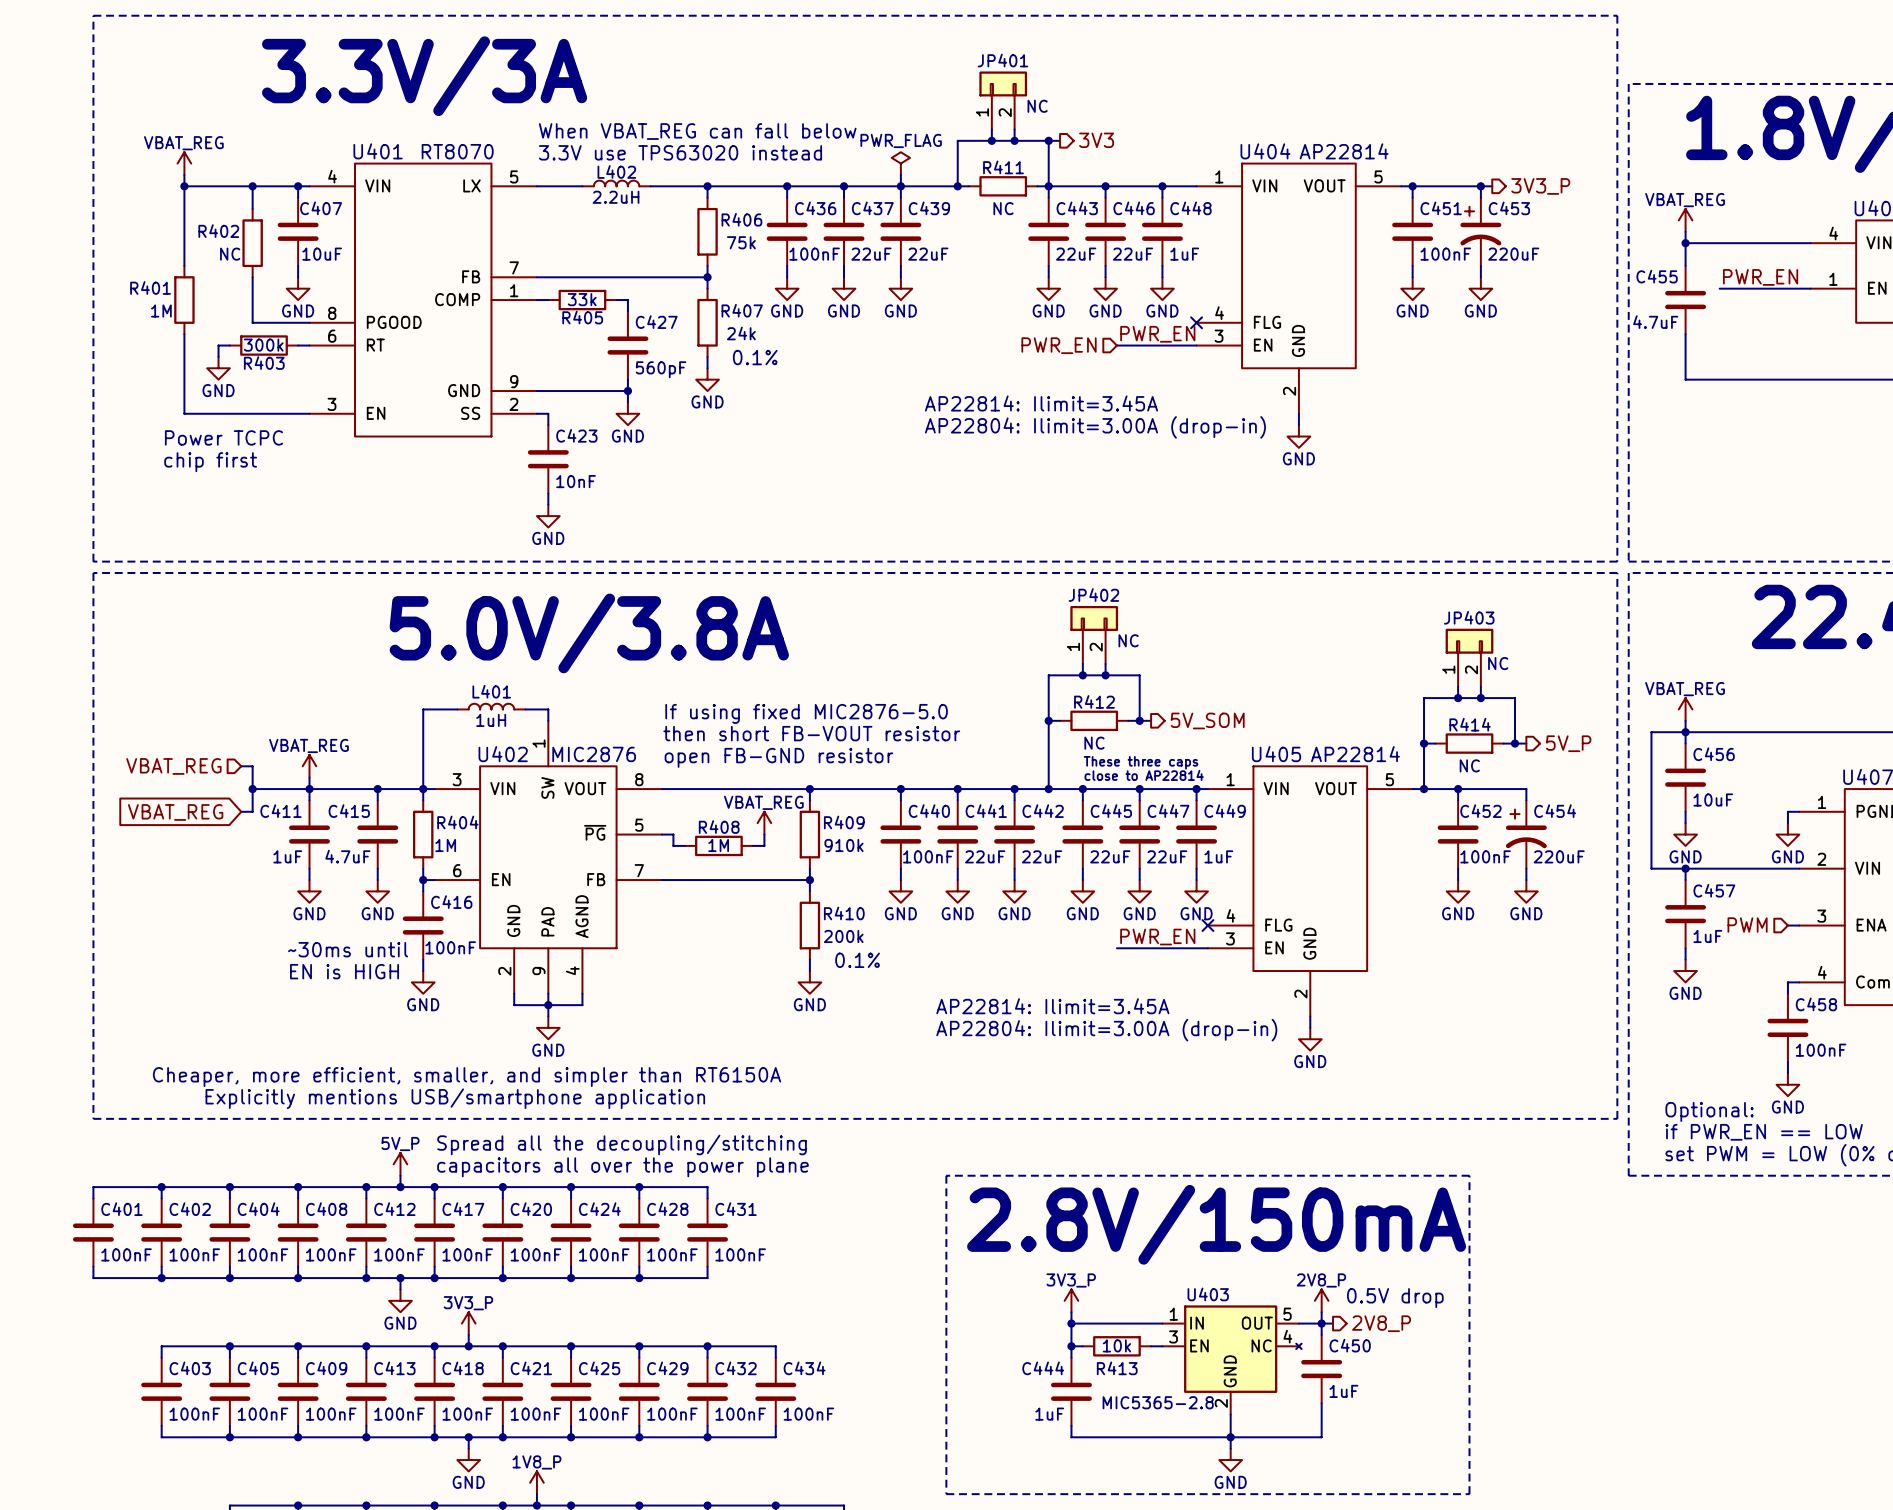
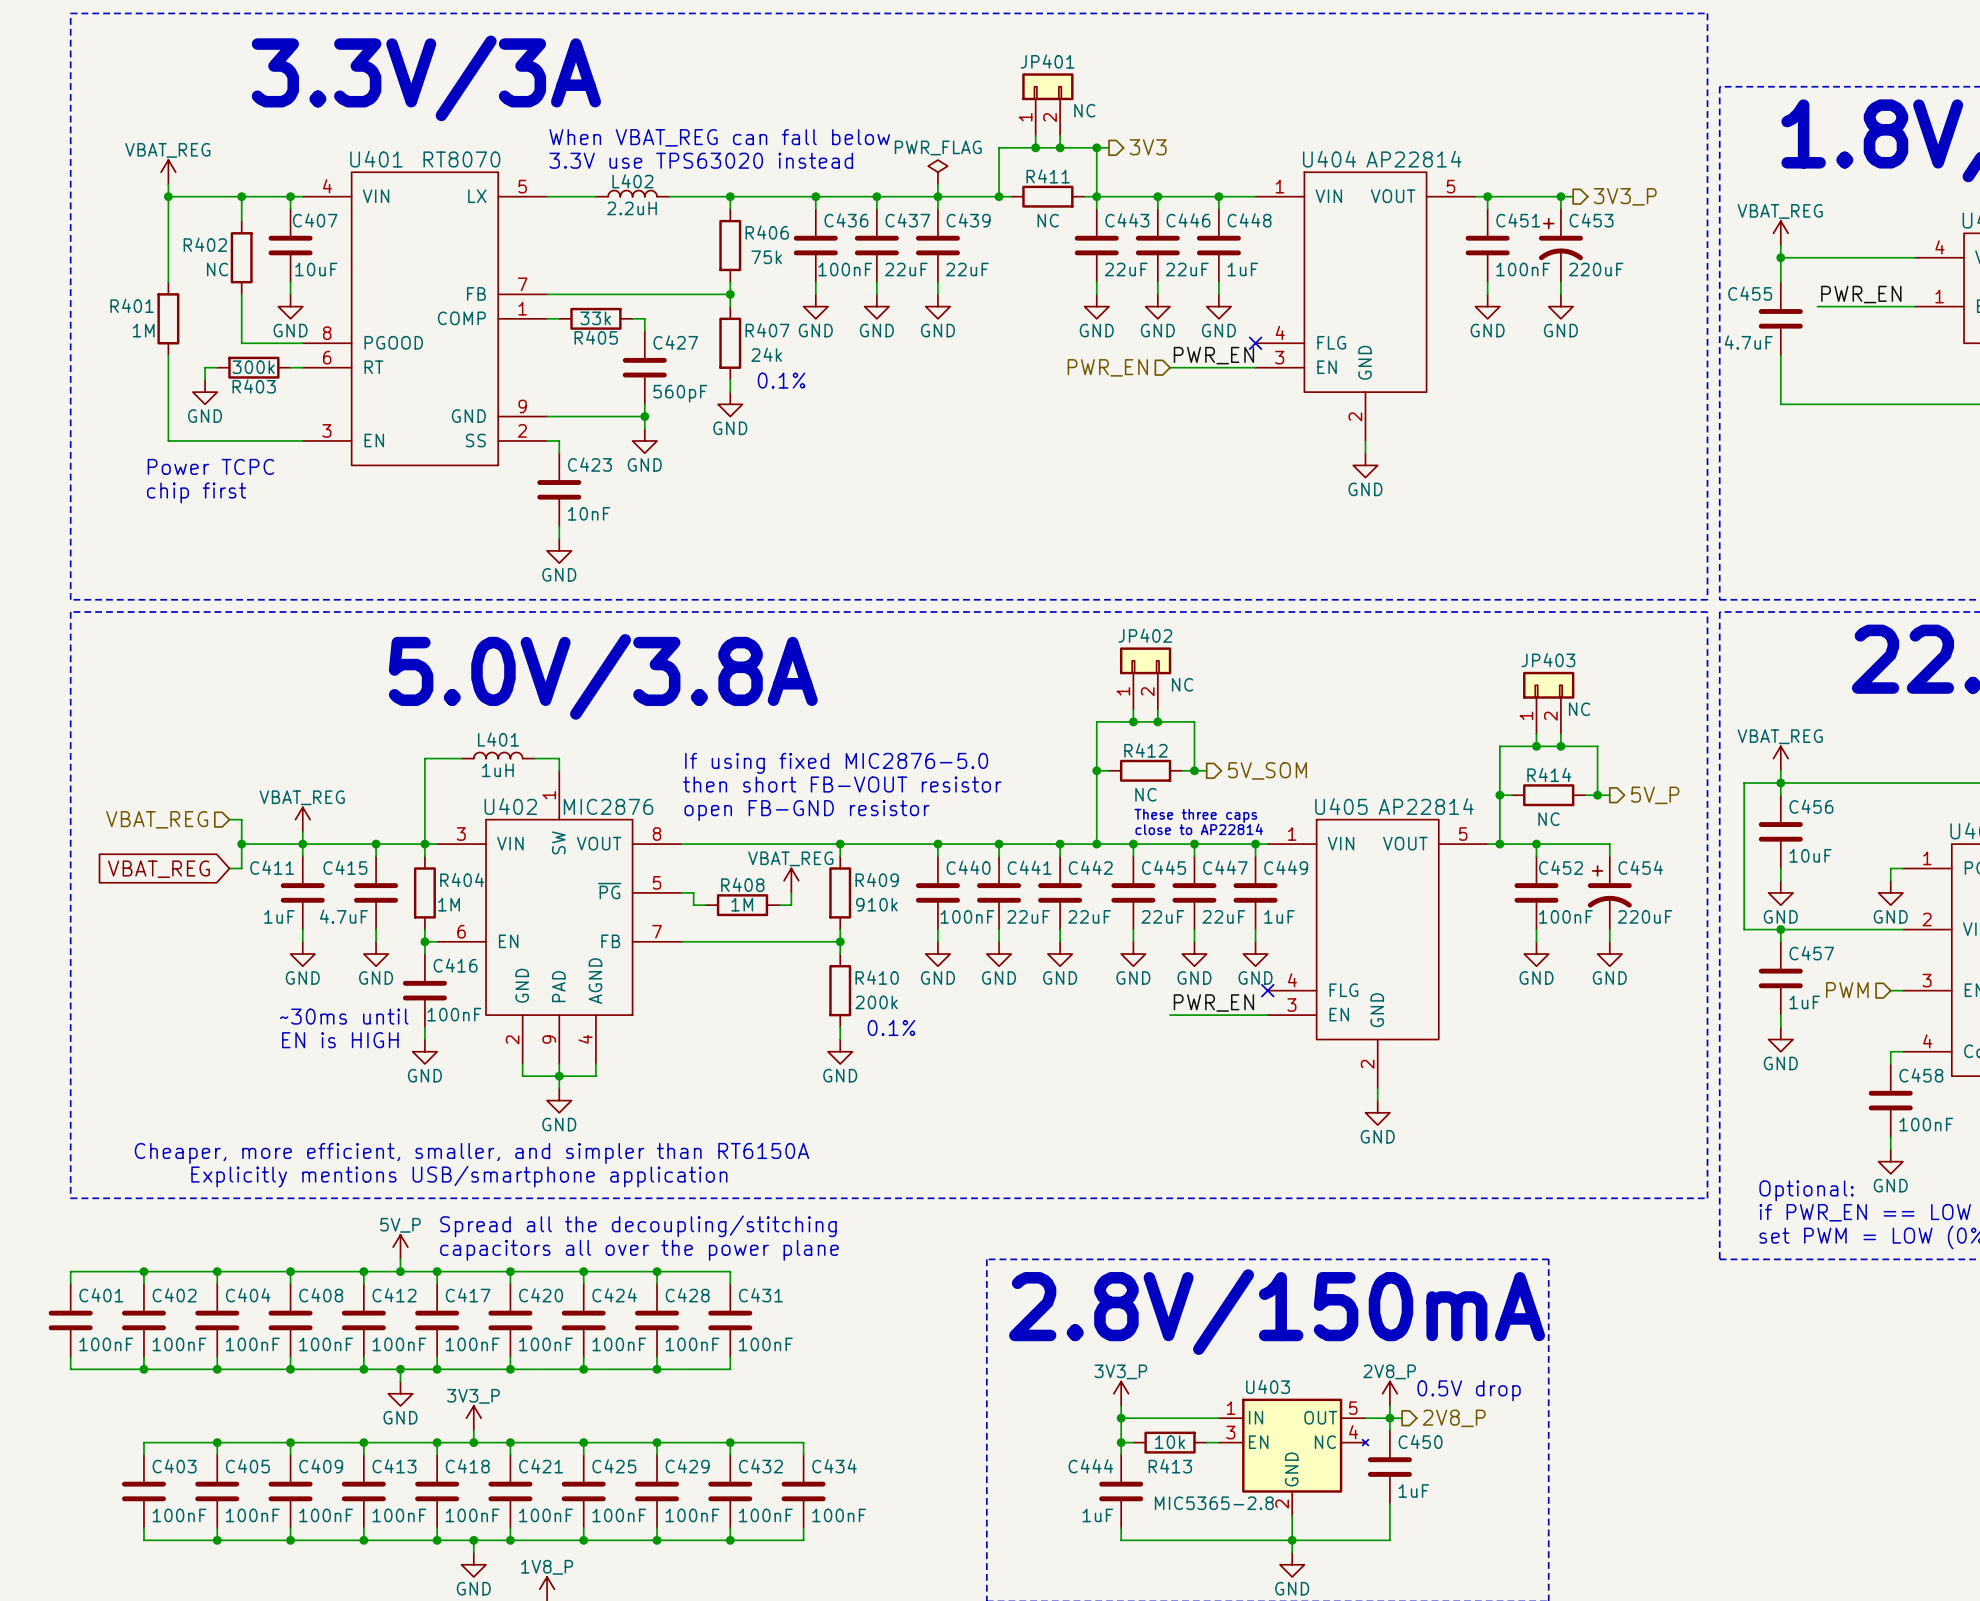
text: AP22814: Ilimit=3.45A (1041, 403) -> none
text: AP22804: Ilimit=3.00A (drop-in) (1095, 427) -> none
text: AP22814: Ilimit=3.45A (1052, 1006) -> none
text: AP22804: Ilimit=3.00A (drop-in) (1106, 1030) -> none

